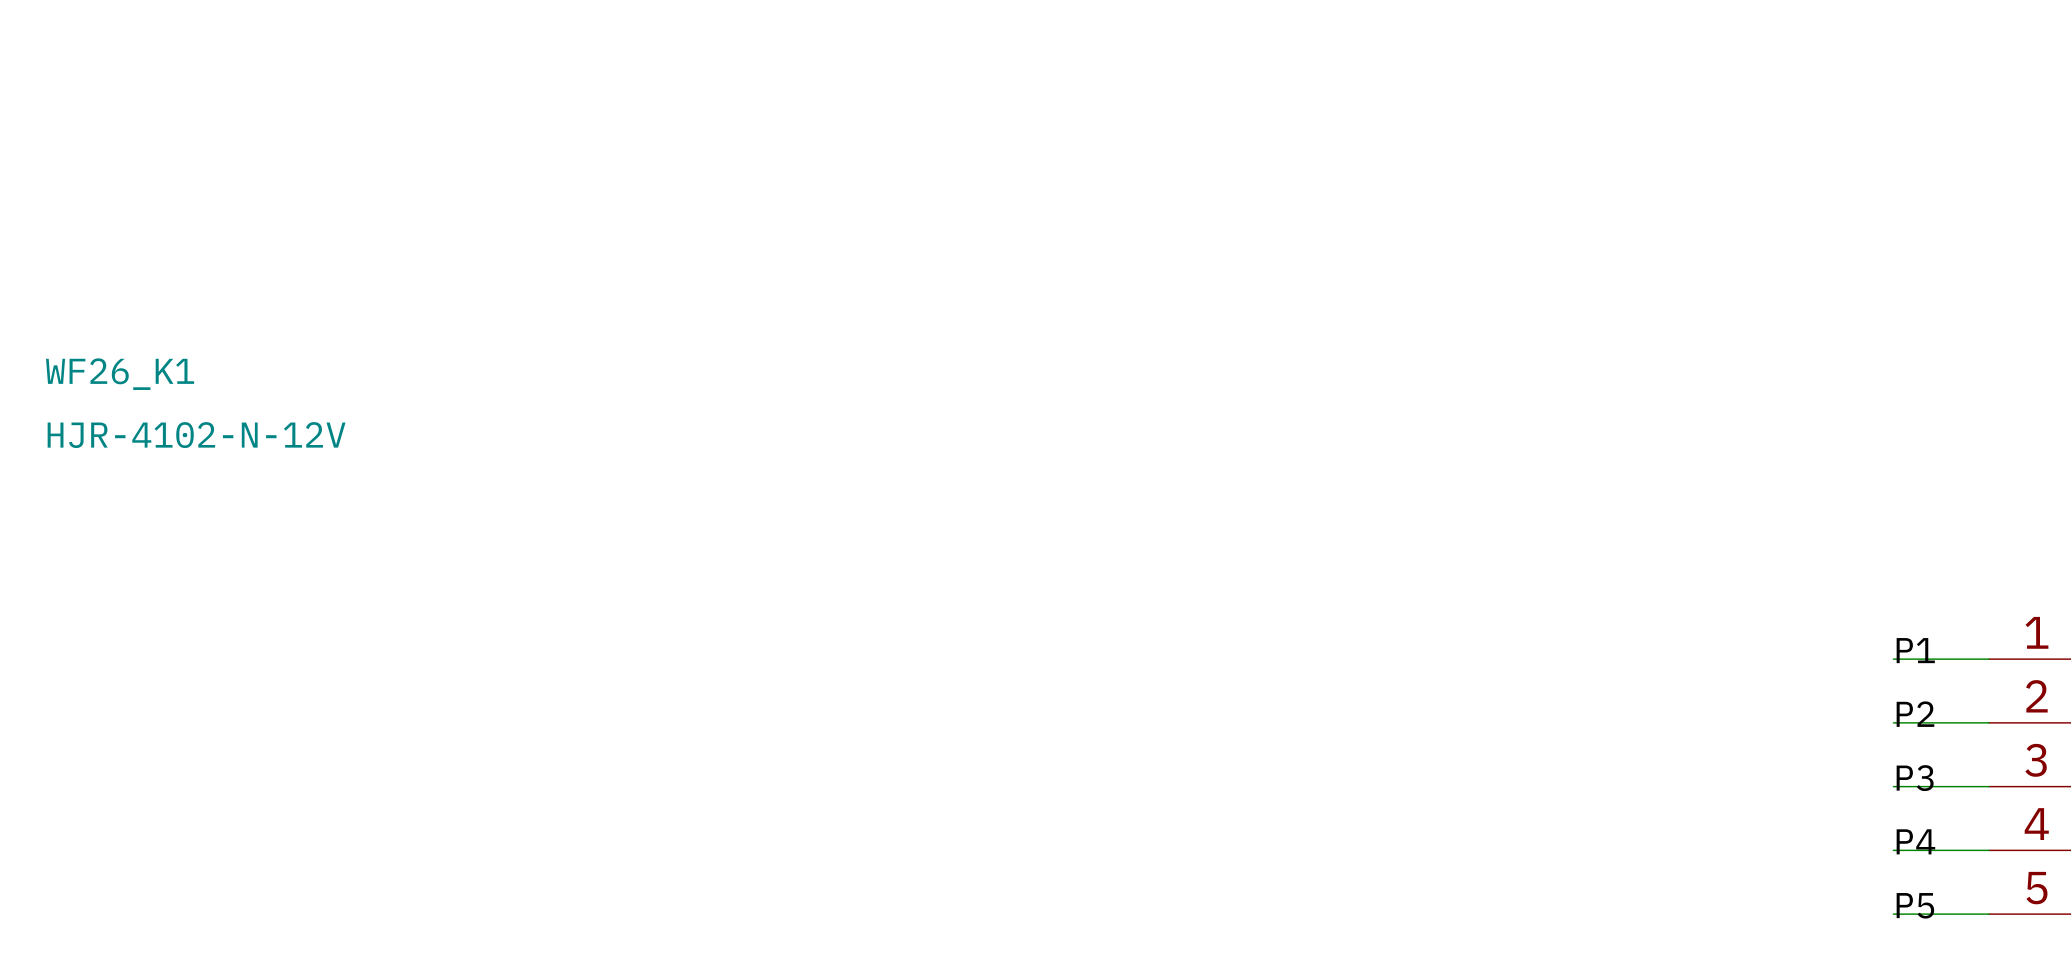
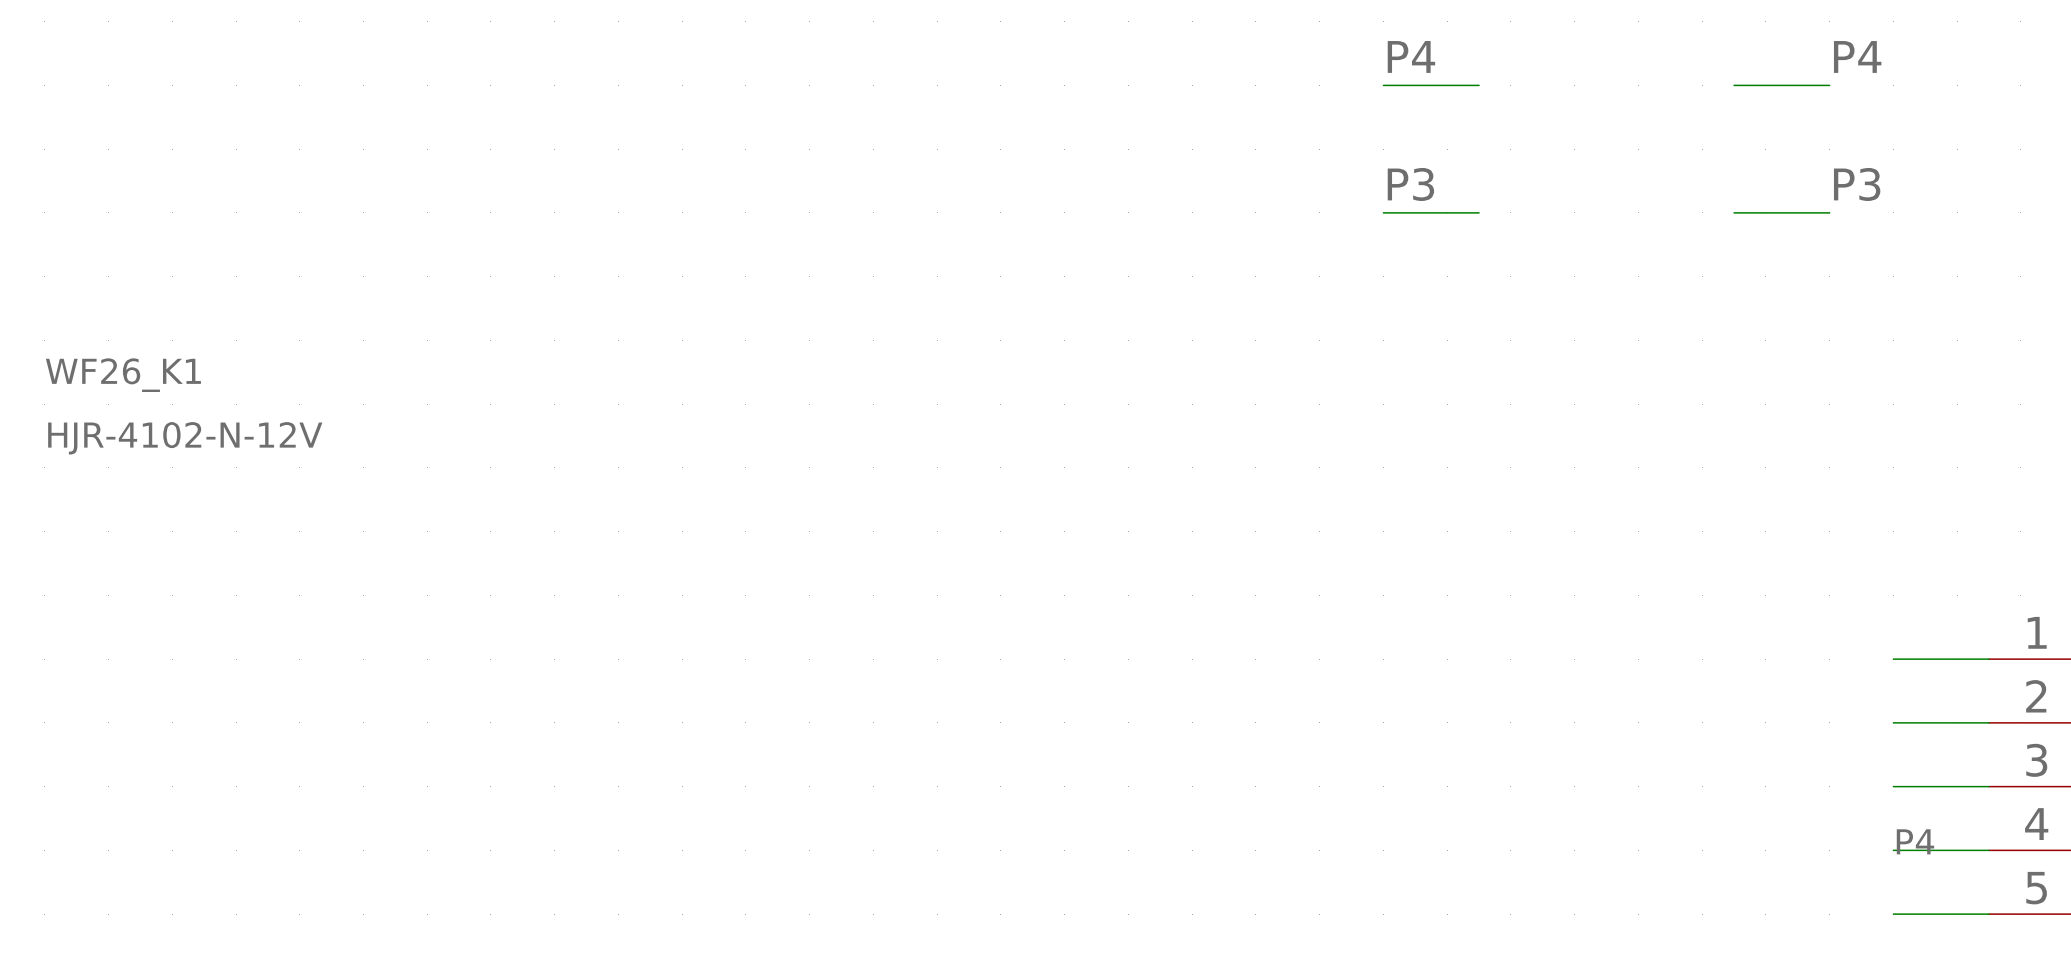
label: none -> P4 (1411, 56)
label: none -> P4 (1857, 56)
wire: none -> (1383, 85) (1479, 85)
wire: none -> (1734, 85) (1829, 85)
label: none -> P3 (1410, 184)
label: none -> P3 (1857, 184)
wire: none -> (1383, 212) (1479, 212)
wire: none -> (1734, 212) (1829, 212)
label: P1 (1915, 650) -> none
label: P2 (1915, 714) -> none
label: P3 (1915, 778) -> none
label: P5 (1915, 905) -> none

